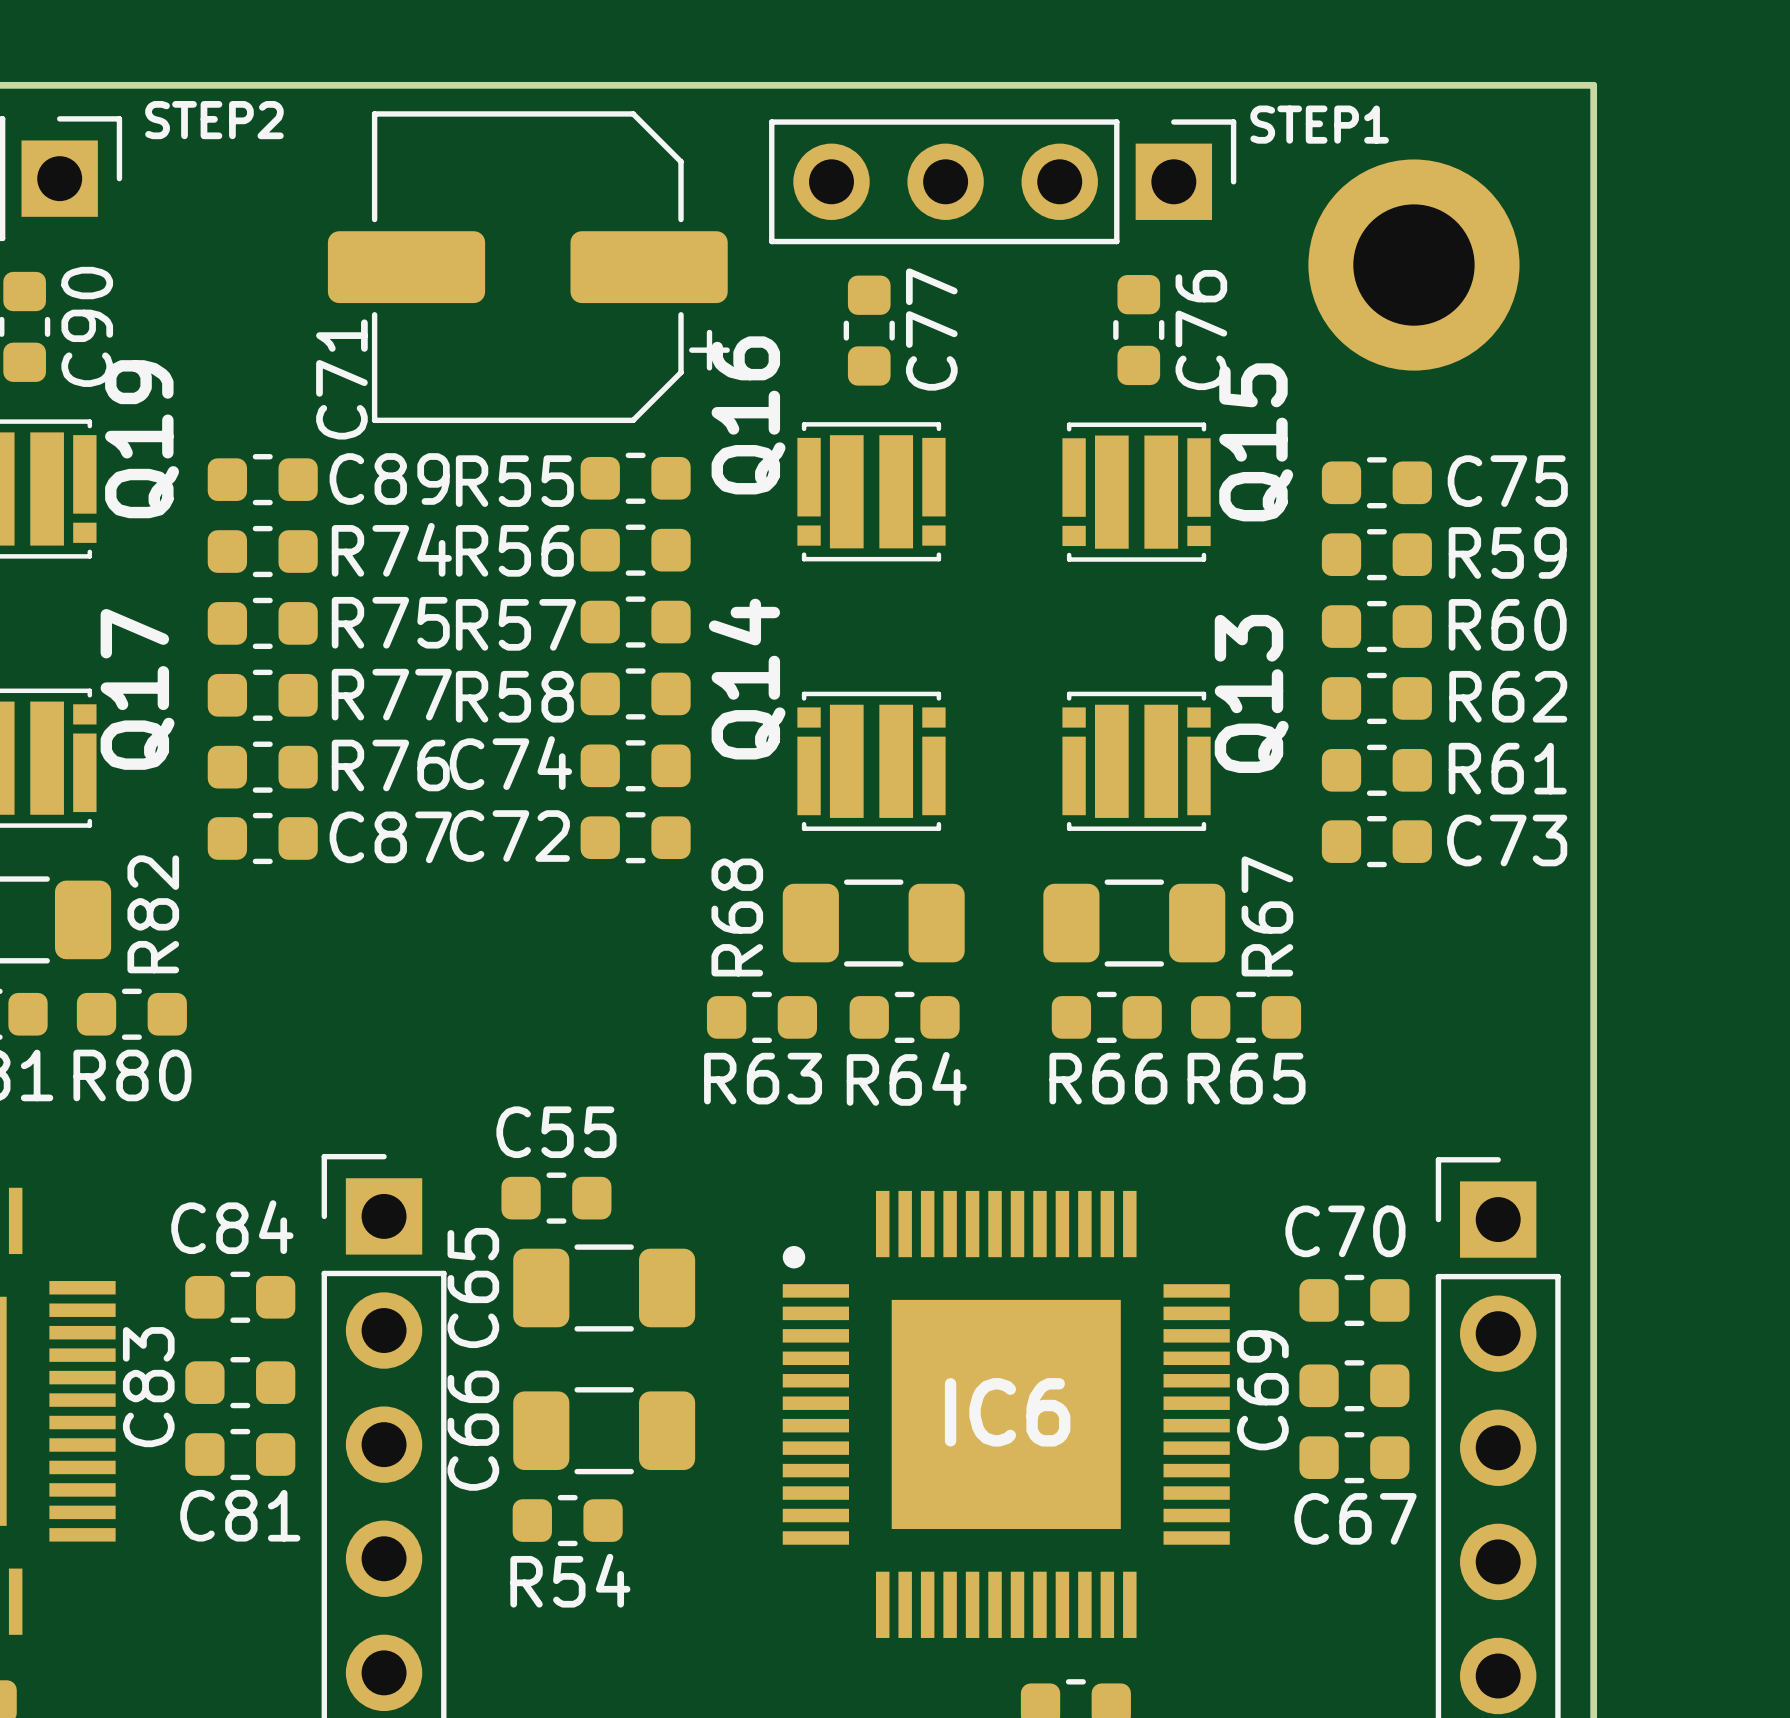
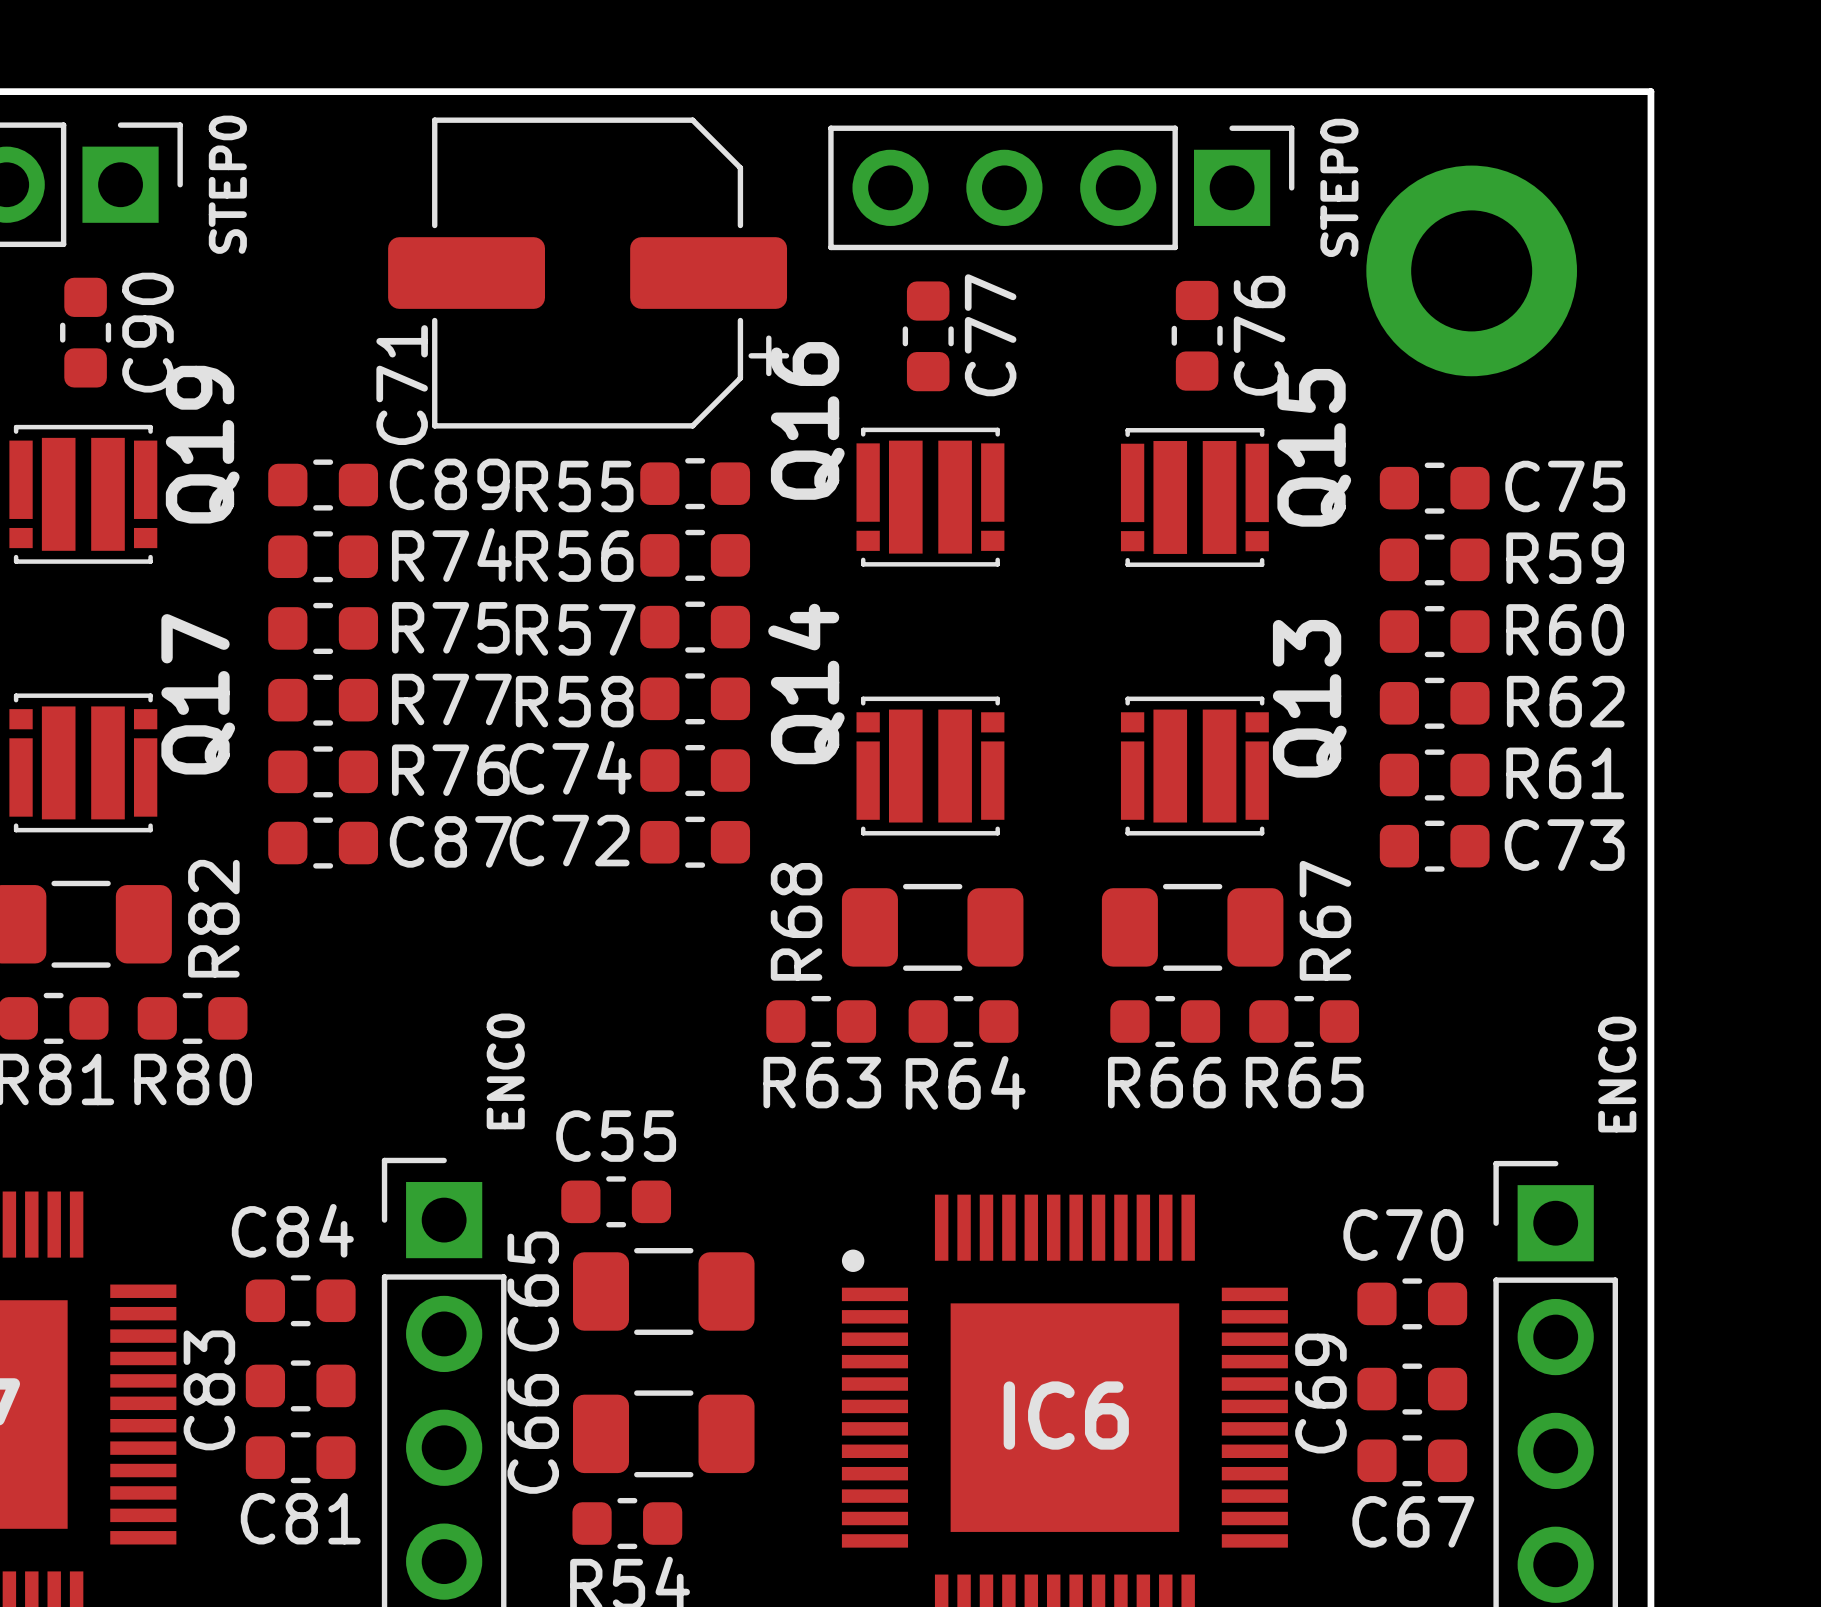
text: STEP2 (214, 120) -> STEP0 (227, 184)
text: STEP1 (1319, 124) -> STEP0 (1339, 187)
text: none -> ENC0 (505, 1071)
text: none -> ENC0 (1617, 1074)

